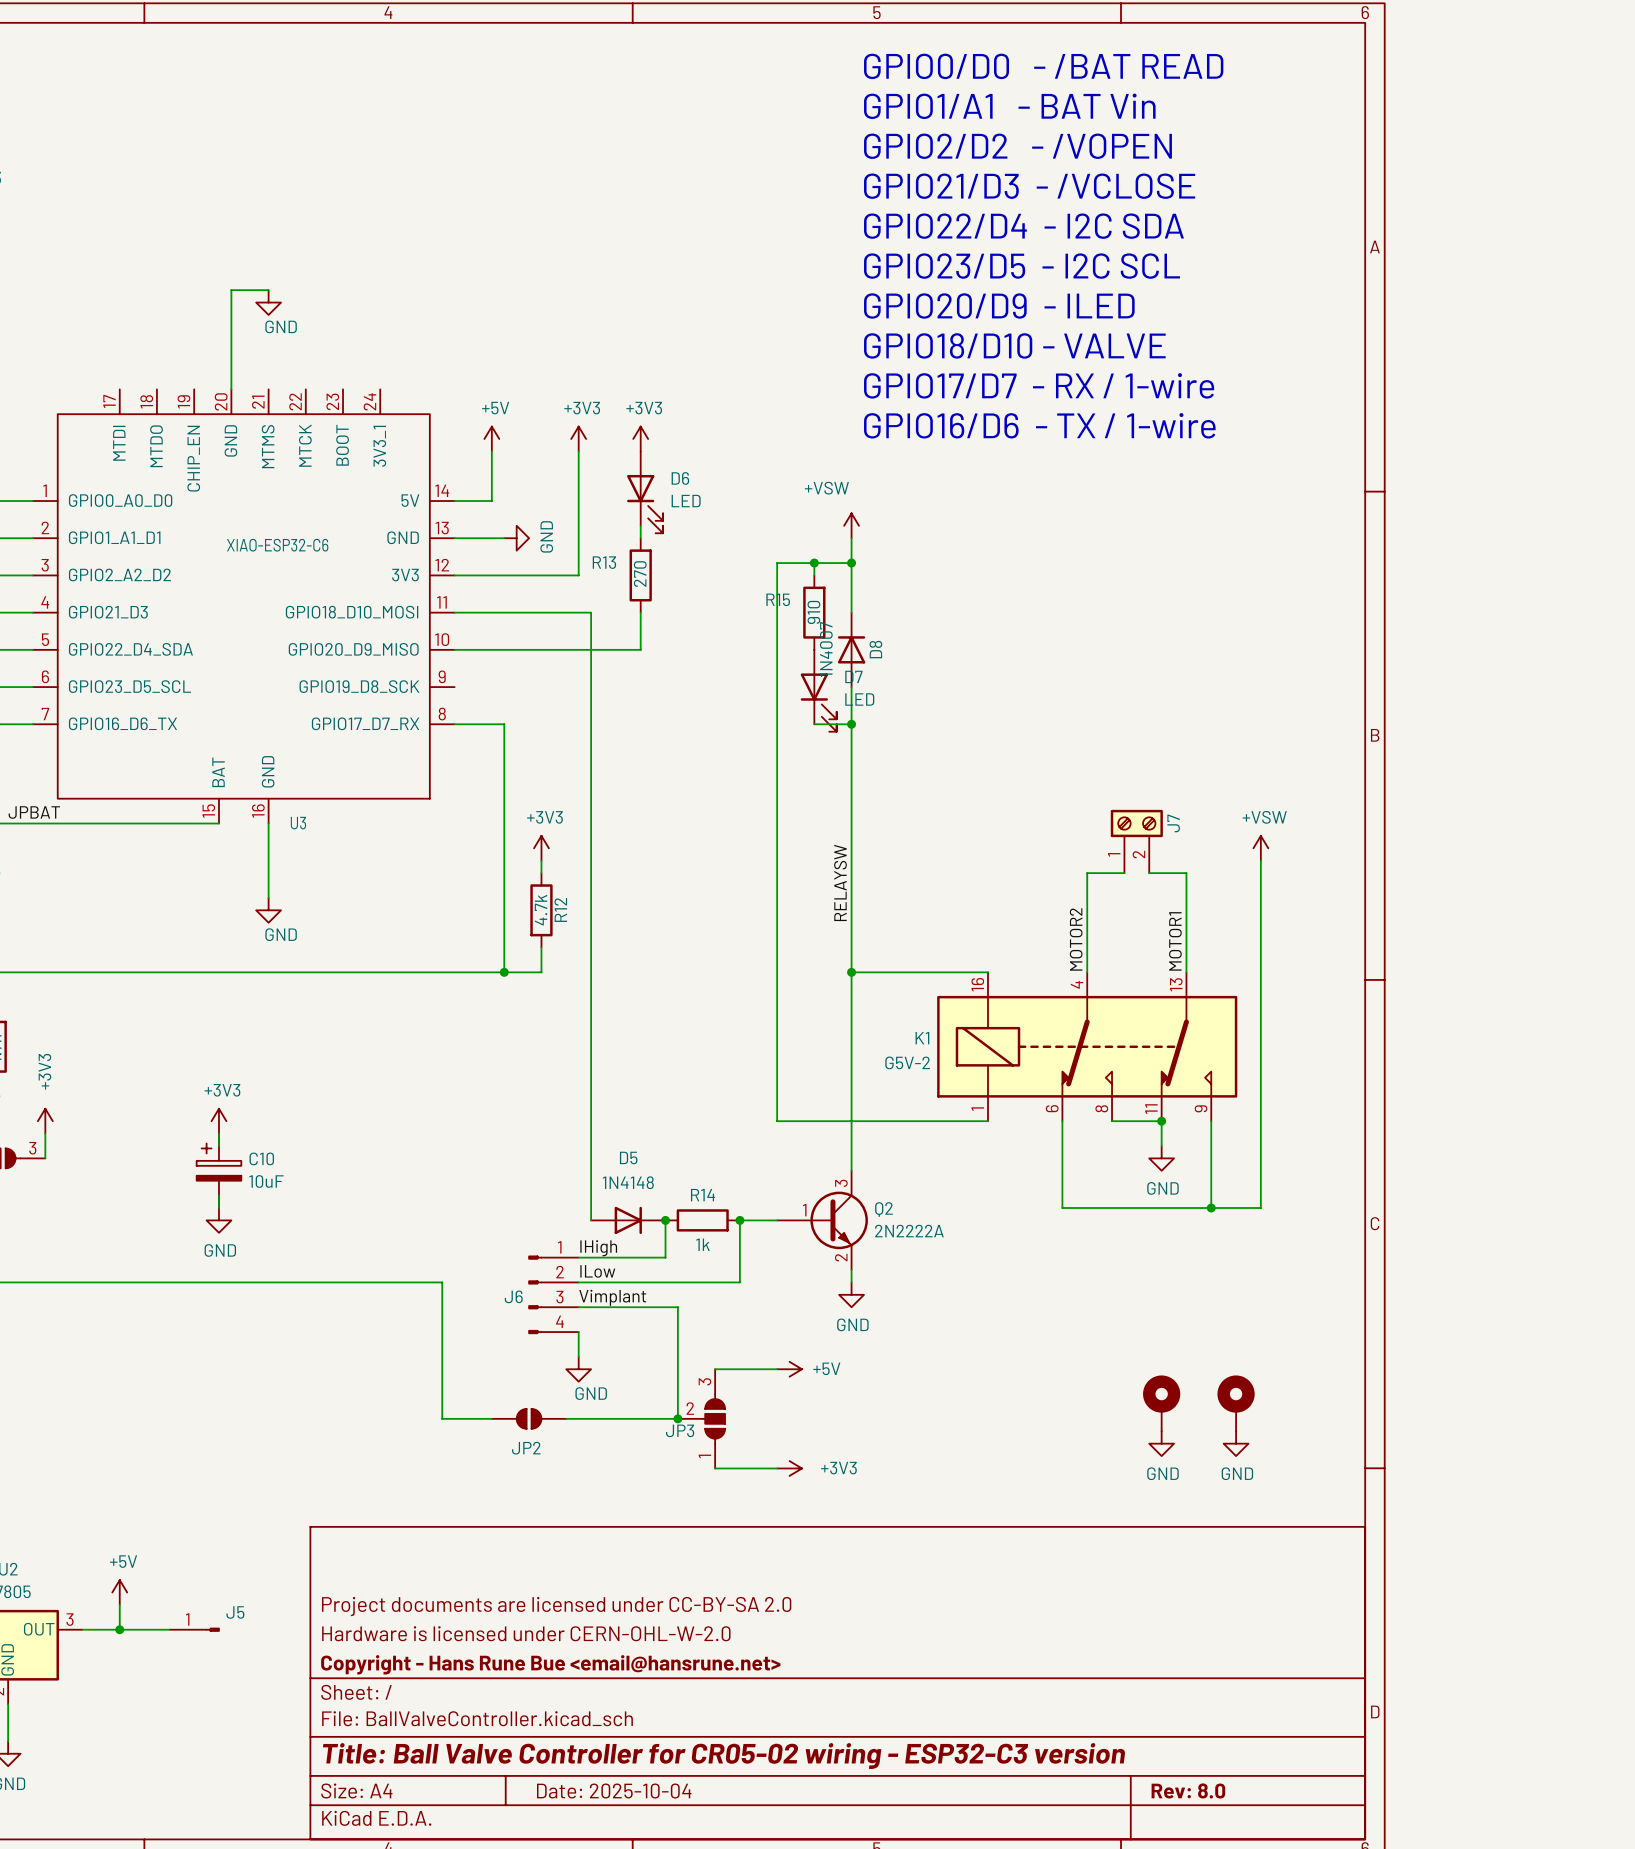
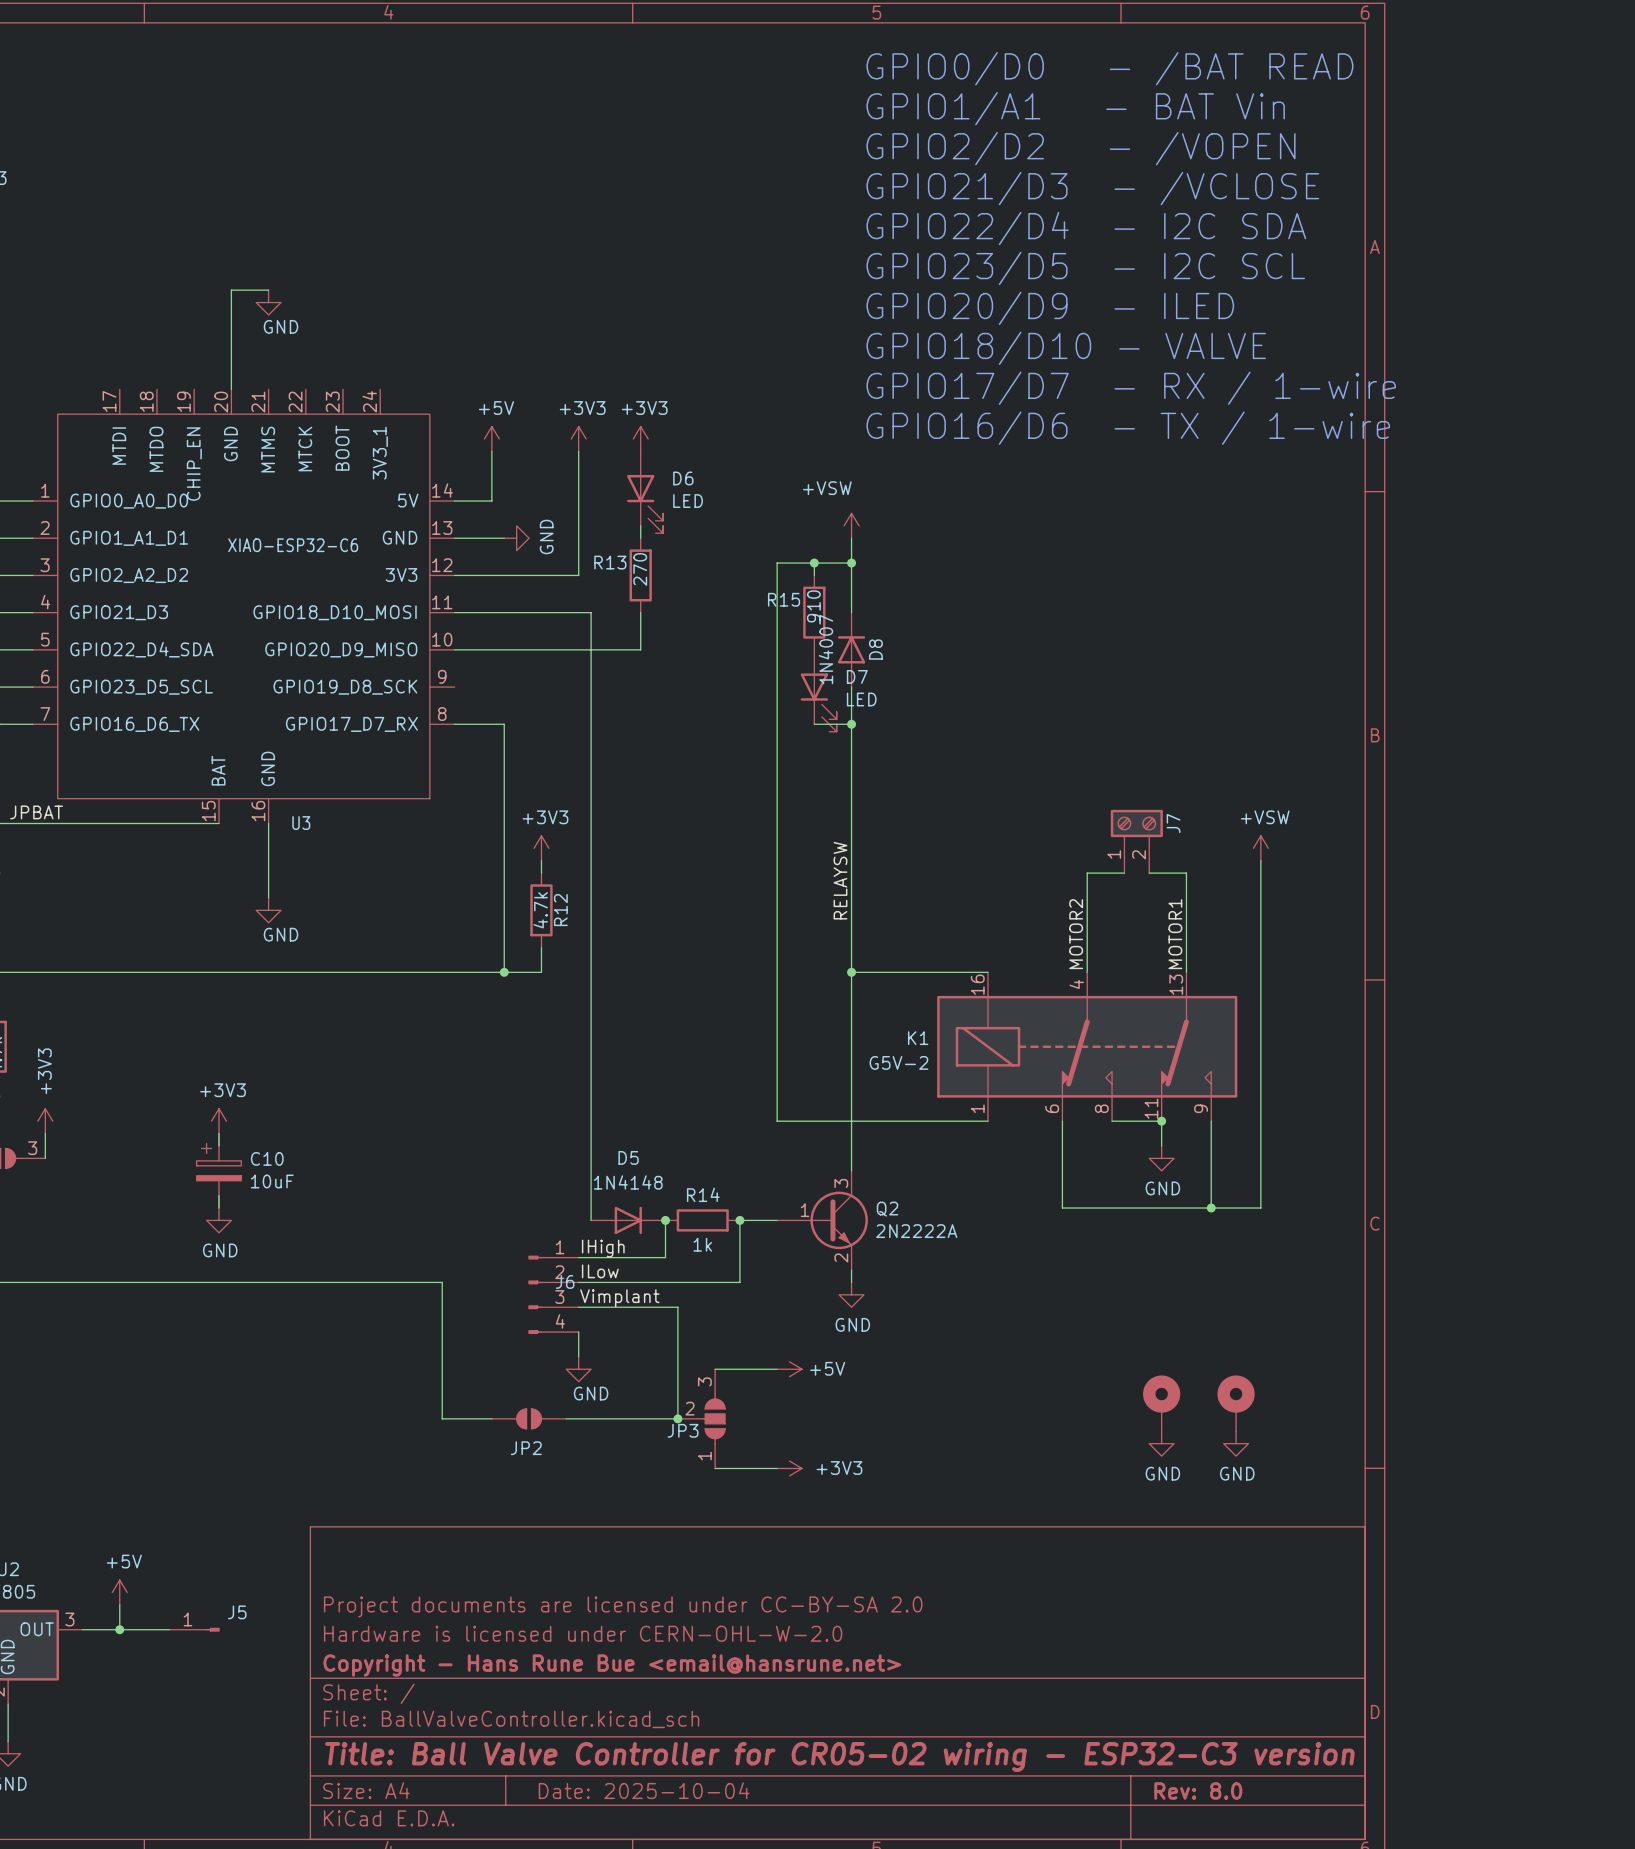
J6 name position: J6 (513, 1296) -> J6 (565, 1281)

